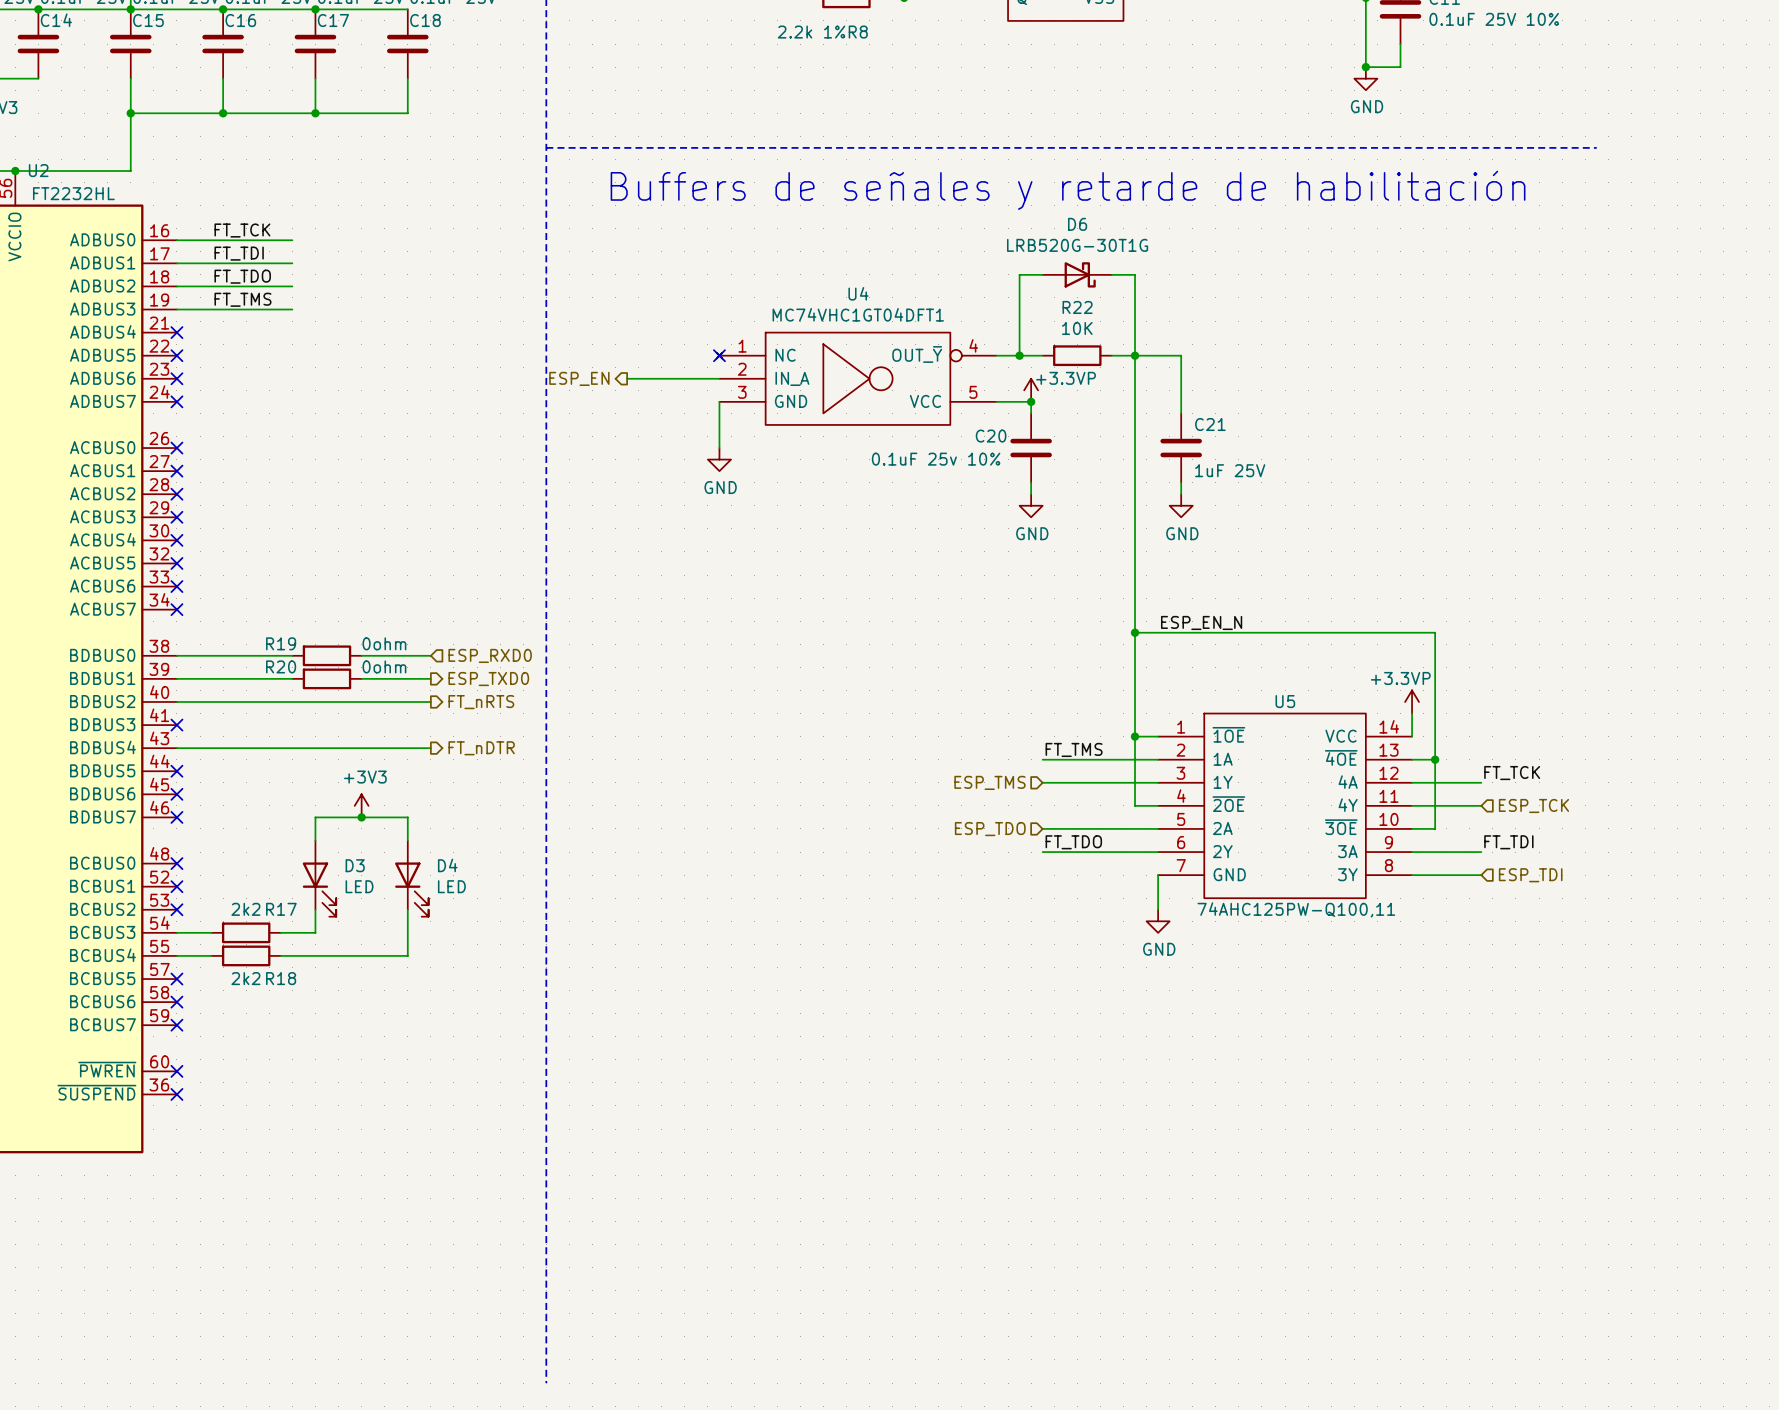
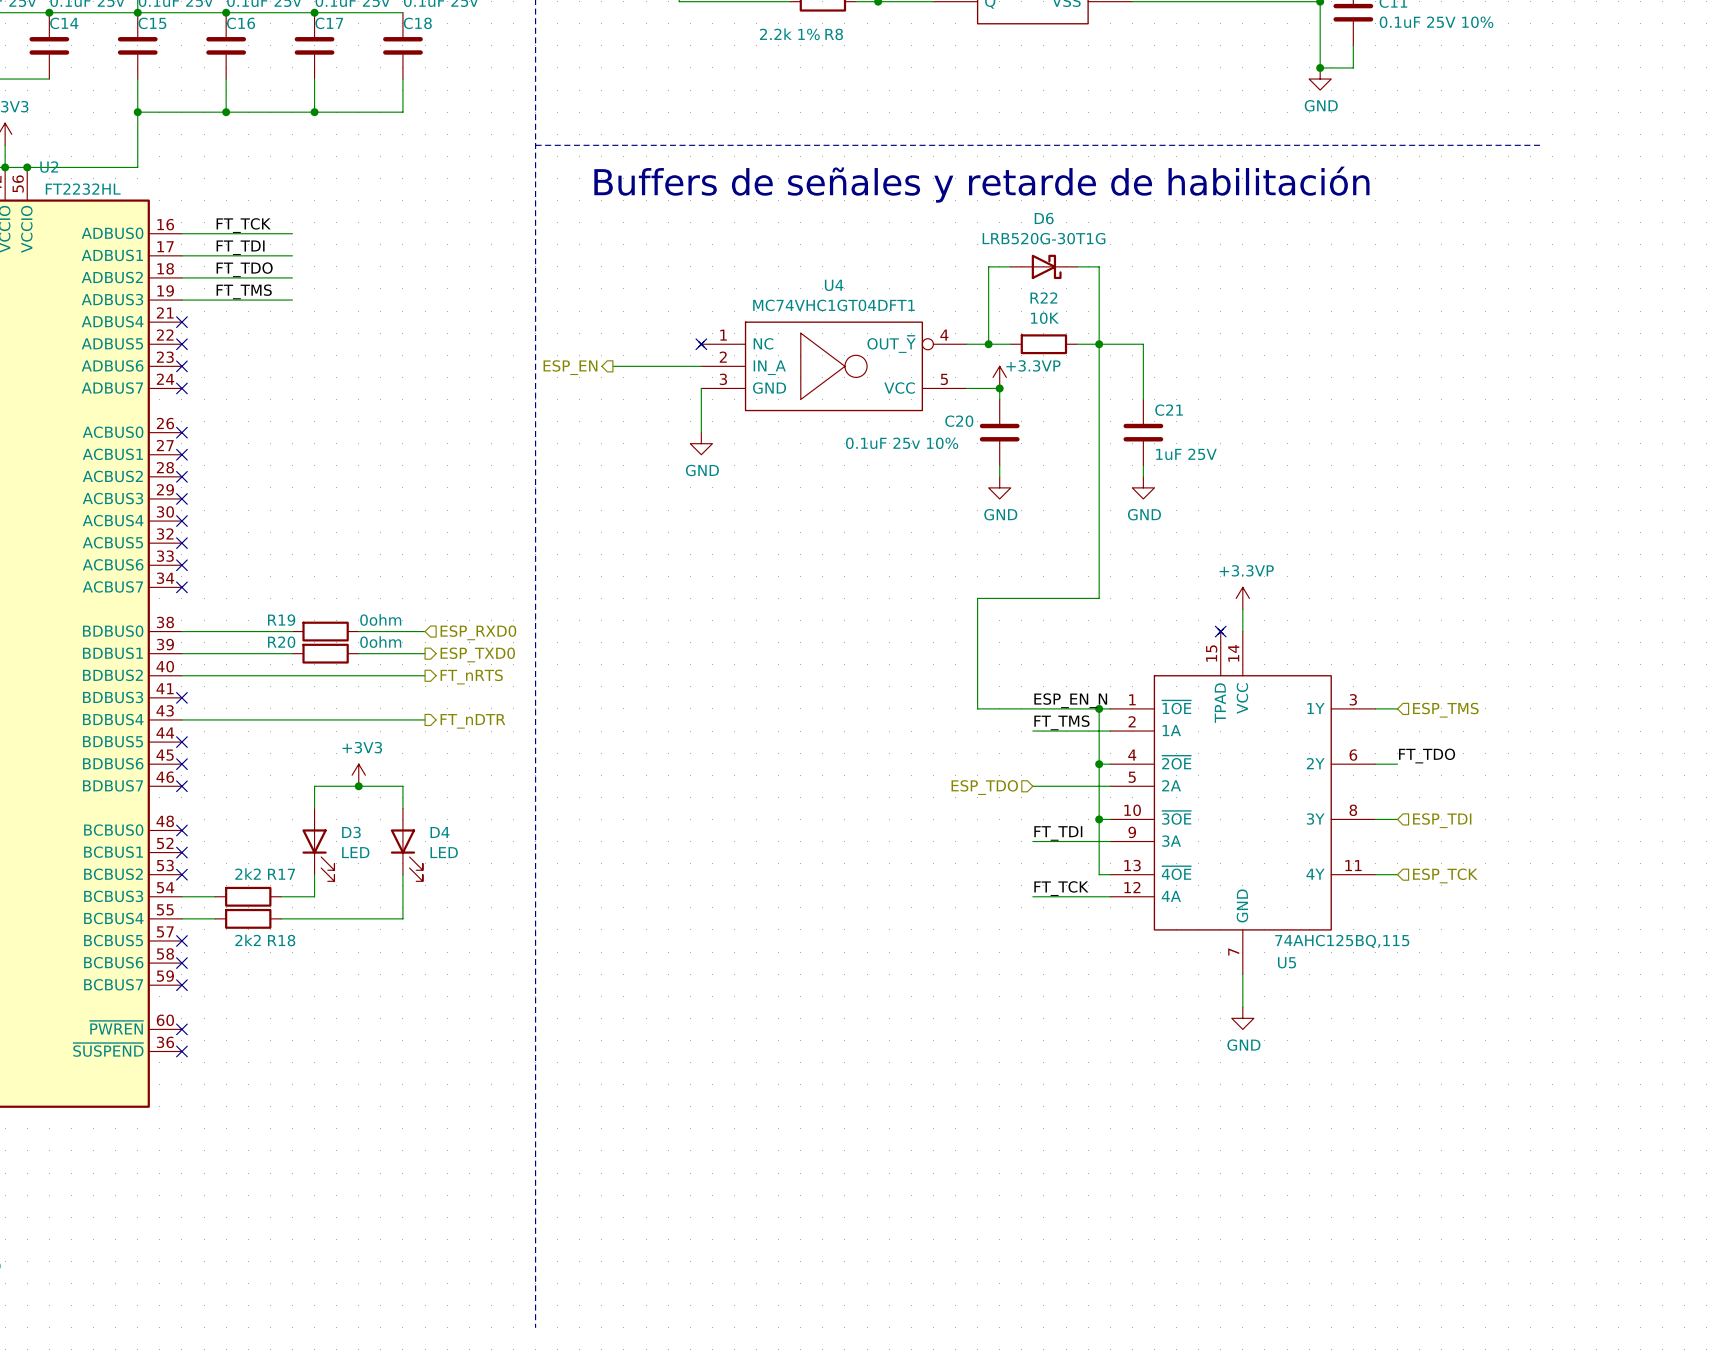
wire: (1135, 621) (1135, 736) -> (1099, 598) (977, 598) (977, 708) (1099, 708)
label position: ESP_EN_N (1201, 622) -> ESP_EN_N (1070, 700)
wire: (1135, 632) (1435, 632) (1435, 828) (1412, 828) -> none
junction: (1135, 632) -> none
no-connect mark: none -> (1220, 631)
power symbol text position: +3.3VP (1400, 678) -> +3.3VP (1246, 570)
U5 name position: U5 (1285, 701) -> U5 (1287, 962)
power symbol position: +3.3VP (1412, 701) -> +3.3VP (1242, 598)
U5 symbol: [1158, 712, 1413, 899] -> [1110, 628, 1376, 975]
wire: (1412, 713) (1412, 736) -> (1242, 609) (1242, 631)
hierarchical label: none -> ESP_TMS (1445, 710)
label position: FT_TMS (1074, 749) -> FT_TMS (1061, 722)
wire: (1042, 759) (1065, 759) -> none
wire: (1412, 759) (1435, 759) -> (1375, 708) (1397, 708)
junction: (1435, 759) -> none
label: FT_TCK (1512, 773) -> FT_TDO (1427, 756)
hierarchical label: ESP_TMS (989, 782) -> none
wire: (1042, 782) (1158, 782) -> none
wire: (1412, 782) (1481, 782) -> none
junction: none -> (1099, 764)
wire: none -> (1375, 764) (1397, 764)
wire: (1135, 805) (1158, 805) -> (1099, 775) (1099, 874) (1110, 874)
wire: (1412, 805) (1481, 805) -> none
hierarchical label position: ESP_TCK (1533, 805) -> ESP_TCK (1445, 875)
wire: none -> (1032, 786) (1110, 786)
wire: (1042, 828) (1158, 828) -> none
hierarchical label position: ESP_TDO (990, 829) -> ESP_TDO (984, 787)
label: FT_TDO (1073, 842) -> FT_TDI (1058, 833)
label: FT_TDI (1508, 842) -> none
wire: (1042, 852) (1135, 852) -> none
junction: none -> (1099, 819)
wire: (1446, 852) (1481, 852) -> none
wire: none -> (1032, 841) (1110, 841)
wire: (1158, 875) (1158, 909) -> (1242, 974) (1242, 1007)
wire: (1412, 875) (1481, 875) -> none
hierarchical label position: ESP_TDI (1530, 875) -> ESP_TDI (1442, 820)
U5 value: 74AHC125PW-Q100,11 (1296, 909) -> 74AHC125BQ,115 (1342, 941)
wire: none -> (1375, 874) (1397, 874)
power symbol position: GND (1158, 921) -> GND (1242, 1018)
label: none -> FT_TCK (1061, 888)
wire: none -> (1032, 896) (1110, 896)

